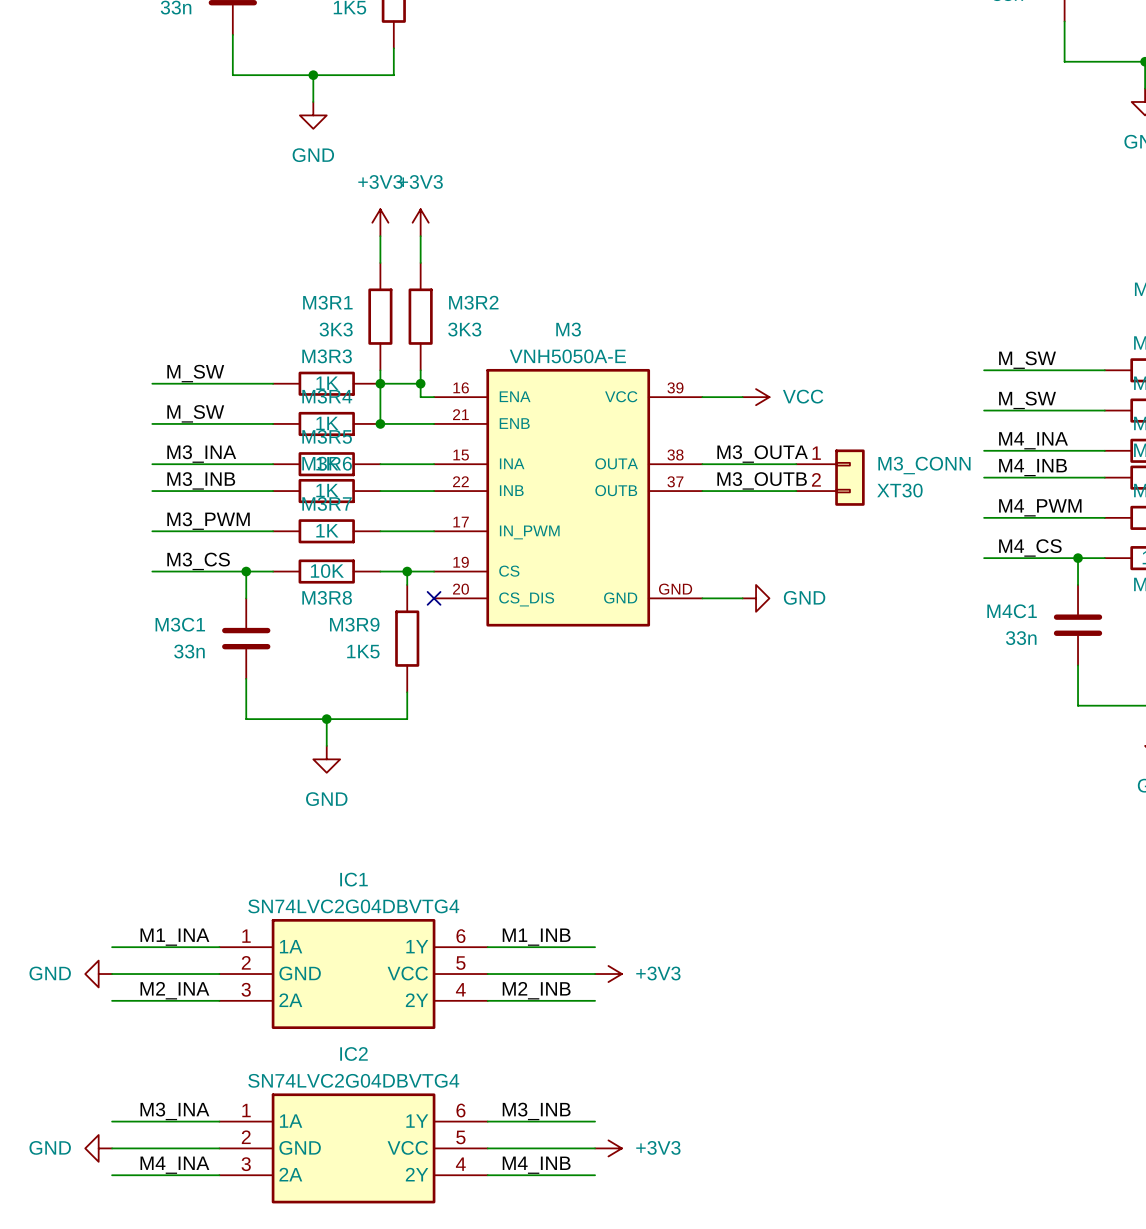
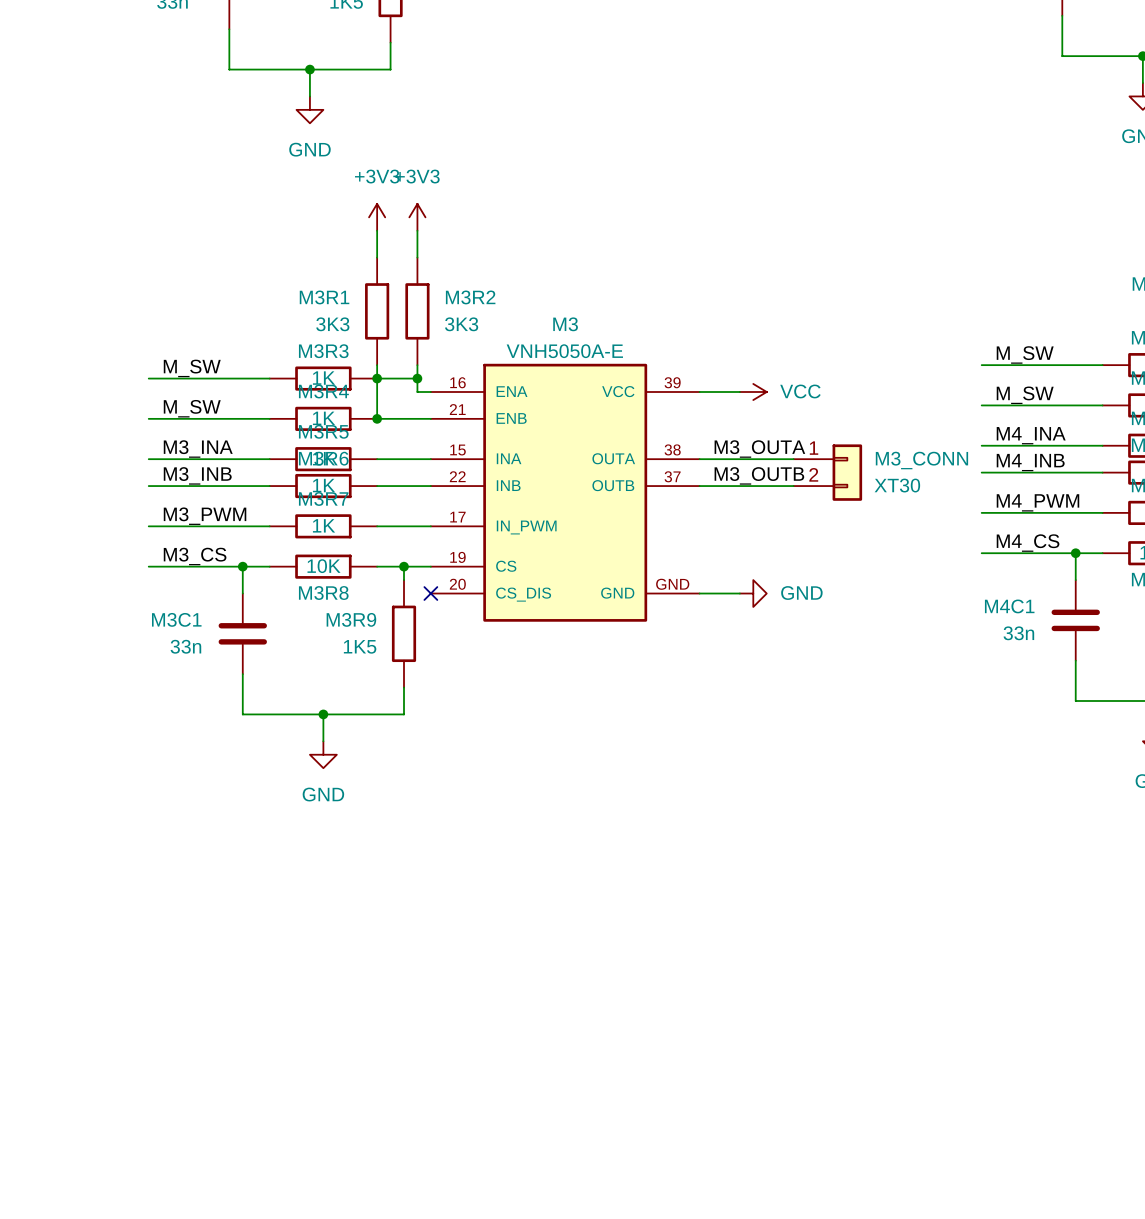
label: M1_INA (174, 937) -> none
label: M1_INB (536, 937) -> none
wire: (112, 947) (219, 947) -> none
wire: (487, 947) (595, 947) -> none
power symbol: GND (98, 974) -> none
wire: (112, 974) (219, 974) -> none
IC1: SN74LVC2G04DBVTG4 (353, 974) -> none
wire: (487, 974) (595, 974) -> none
power symbol: +3V3 (608, 974) -> none
label: M2_INA (174, 990) -> none
label: M2_INB (536, 990) -> none
wire: (112, 1000) (219, 1000) -> none
wire: (487, 1000) (595, 1000) -> none
label: M3_INA (174, 1111) -> none
label: M3_INB (536, 1111) -> none
wire: (112, 1121) (219, 1121) -> none
wire: (487, 1121) (595, 1121) -> none
power symbol: GND (98, 1148) -> none
wire: (112, 1148) (219, 1148) -> none
IC2: SN74LVC2G04DBVTG4 (353, 1148) -> none
wire: (487, 1148) (595, 1148) -> none
power symbol: +3V3 (608, 1148) -> none
label: M4_INA (174, 1165) -> none
label: M4_INB (536, 1165) -> none
wire: (112, 1175) (219, 1175) -> none
wire: (487, 1175) (595, 1175) -> none

